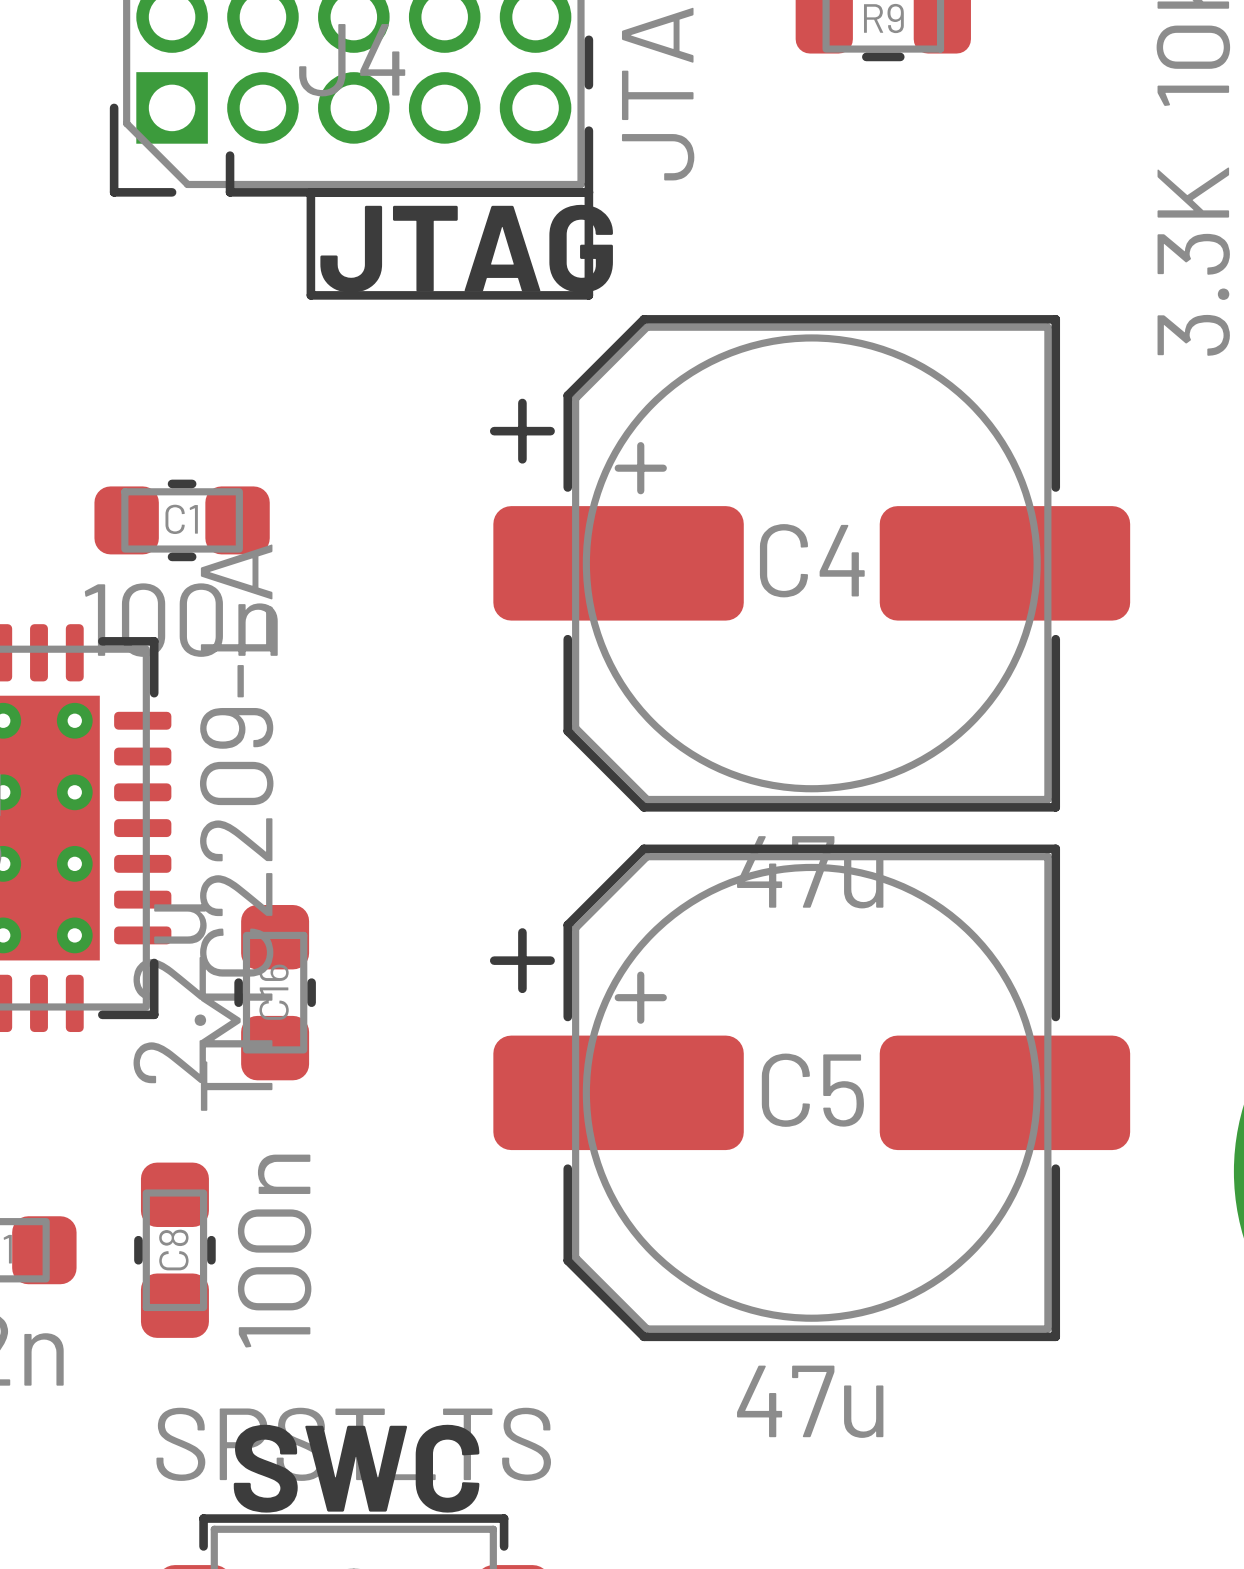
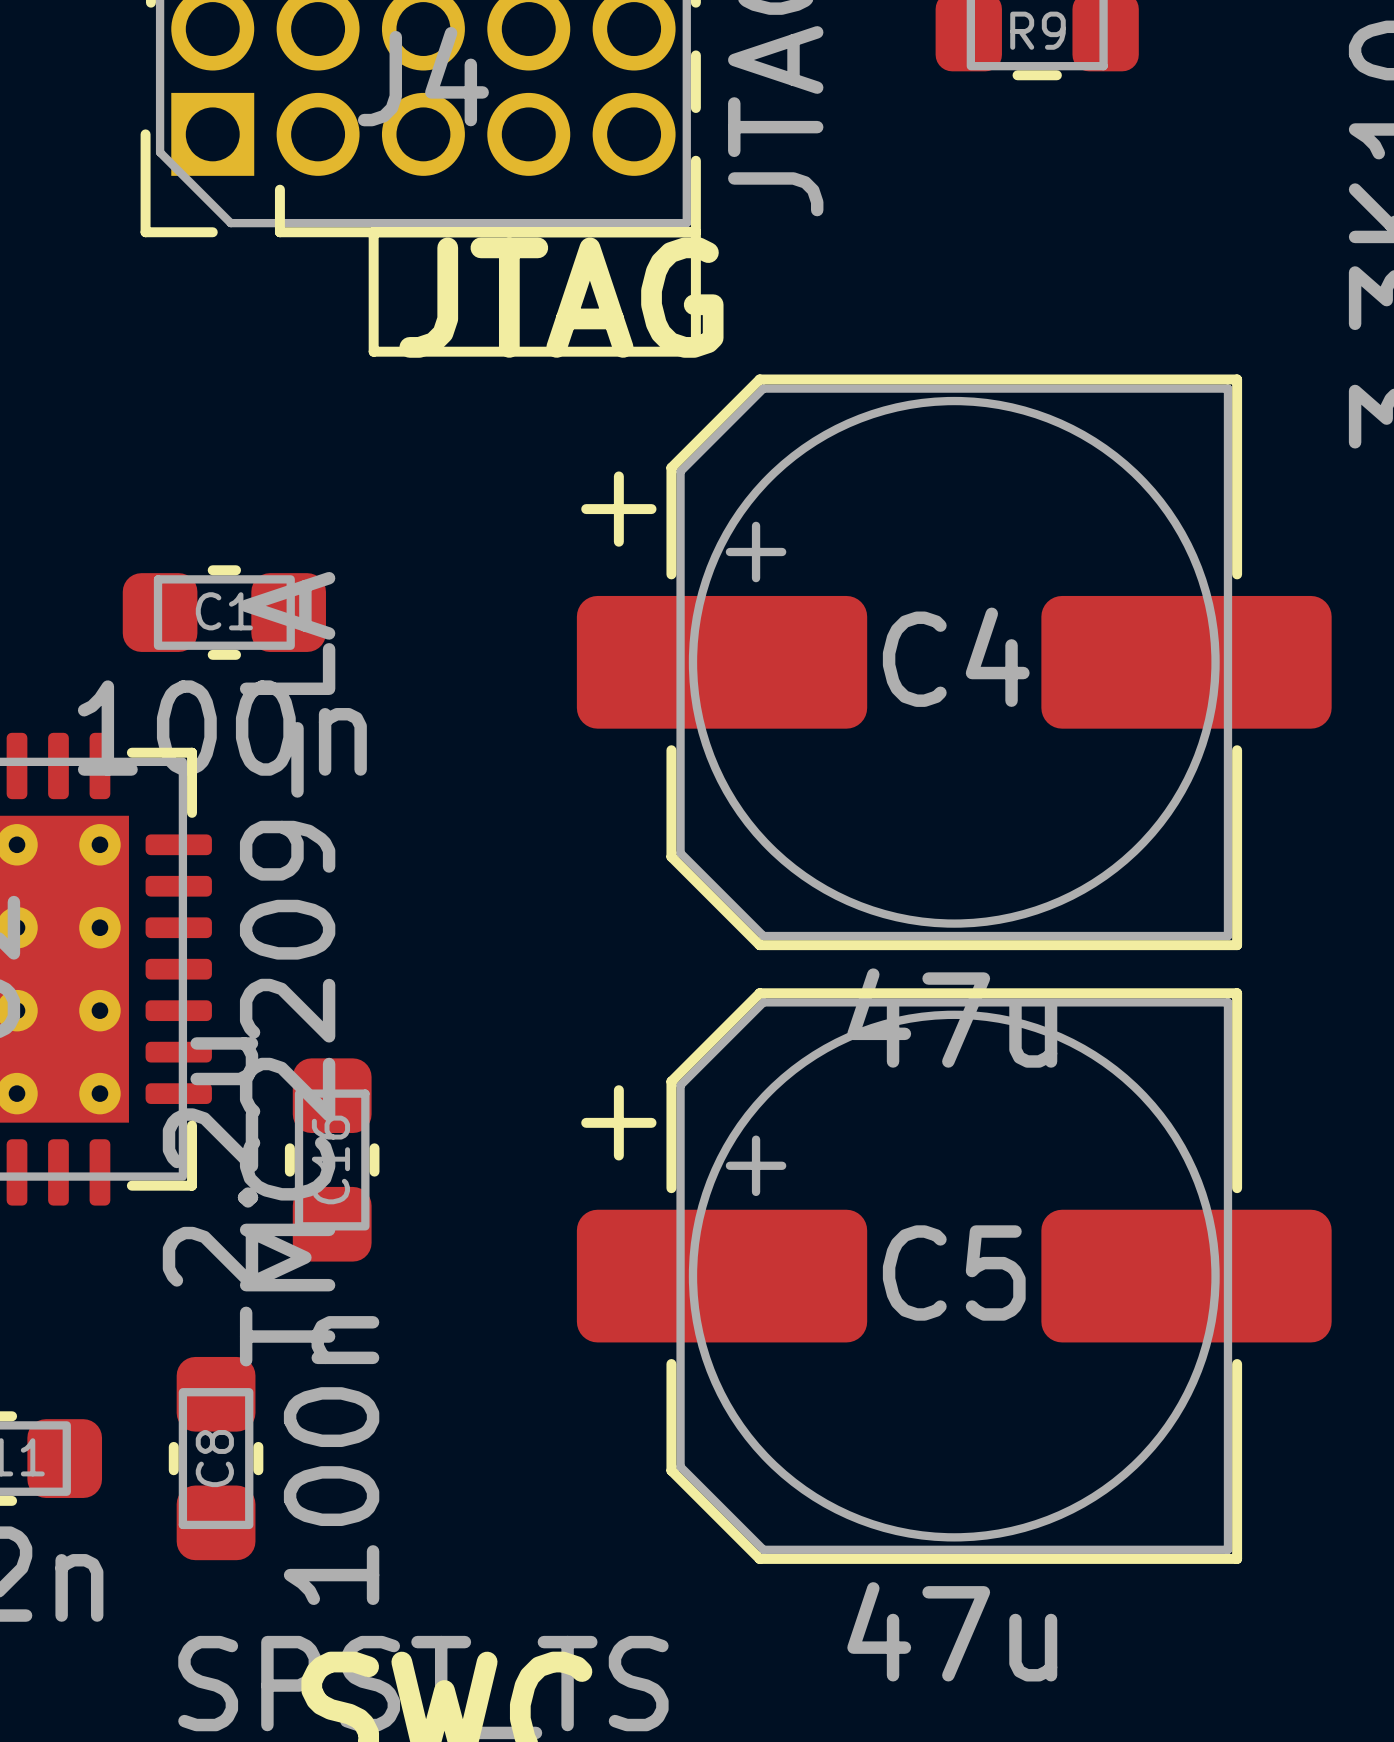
C4 footprint: [489, 315, 1131, 812] -> [576, 374, 1332, 951]
C5 footprint: [489, 844, 1131, 1342] -> [576, 988, 1332, 1564]

